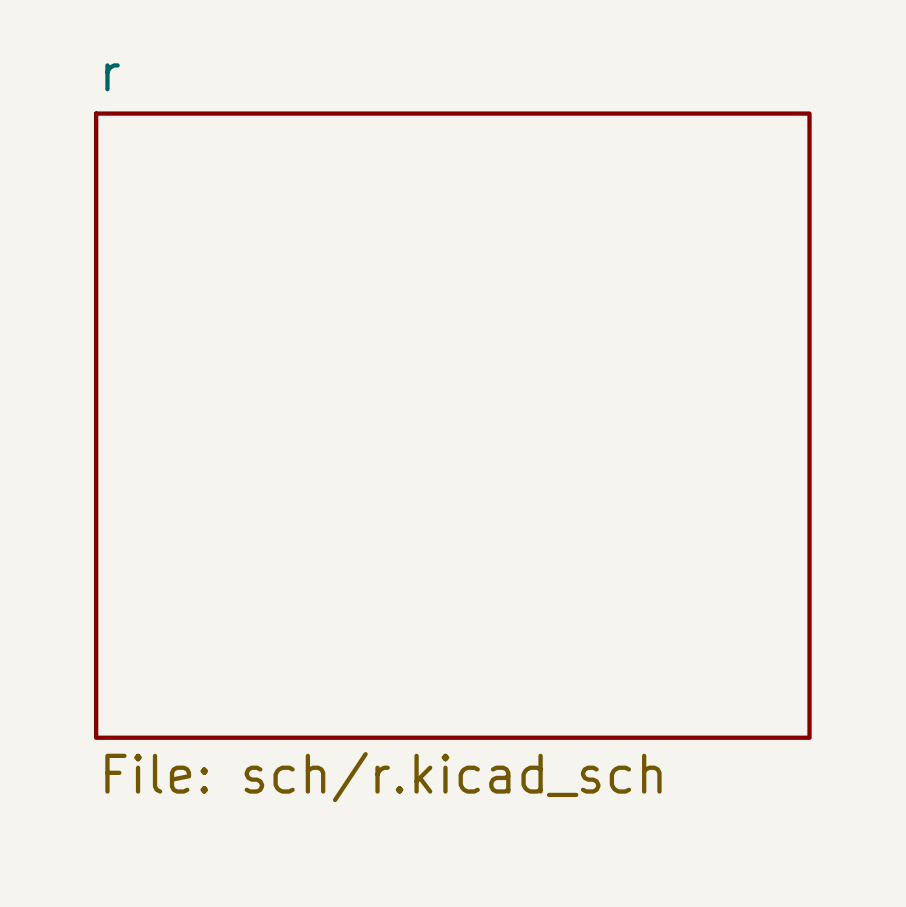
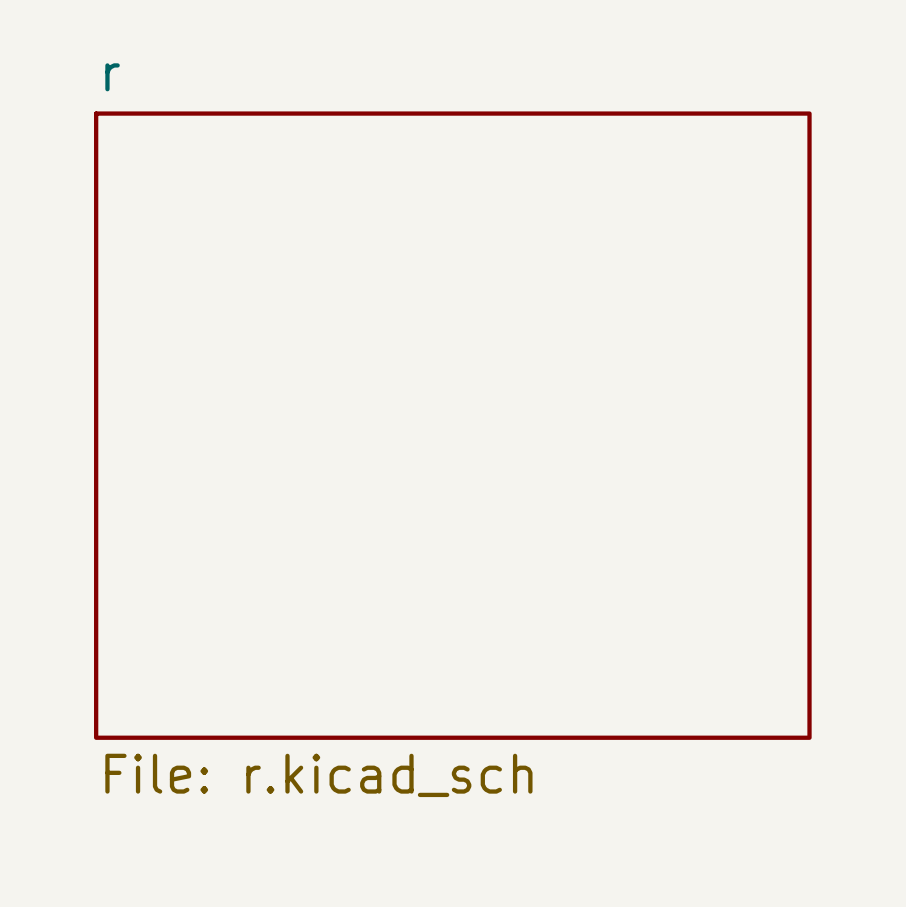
sheet r value: File: sch/r.kicad_sch (383, 777) -> File: r.kicad_sch (318, 775)

